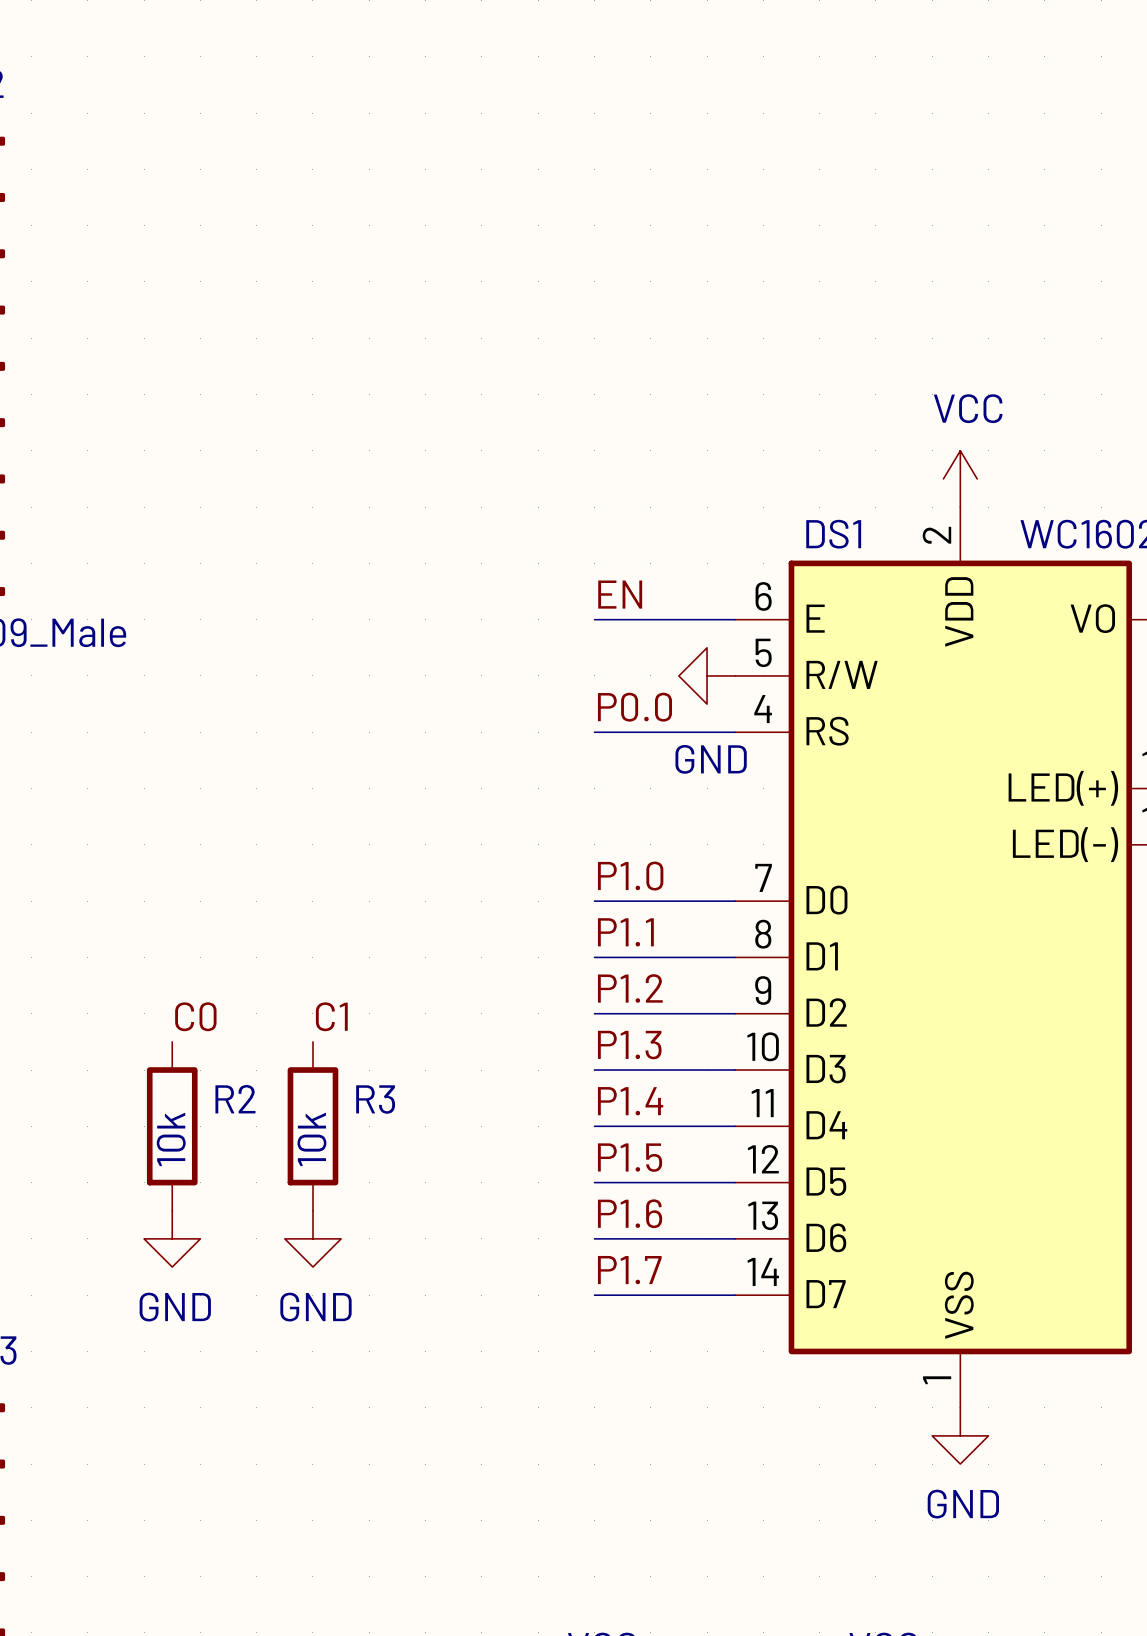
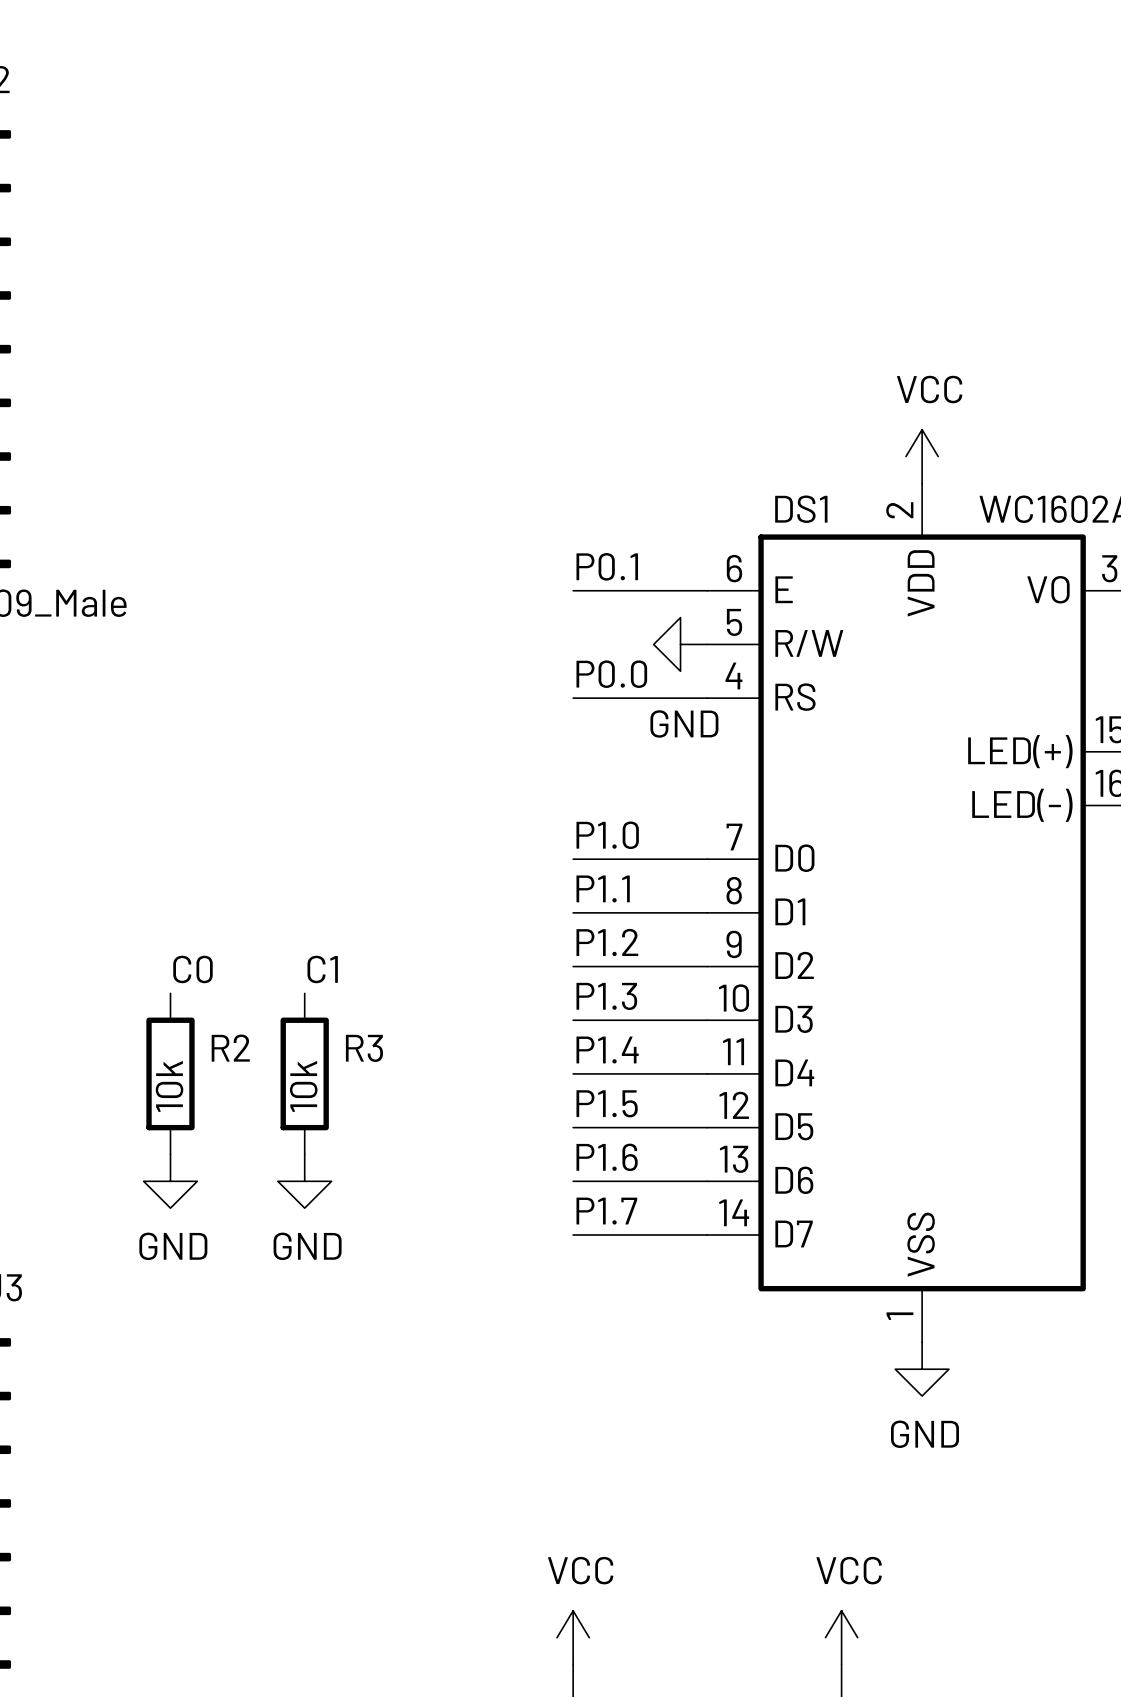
label: EN (620, 594) -> P0.1 (607, 566)

